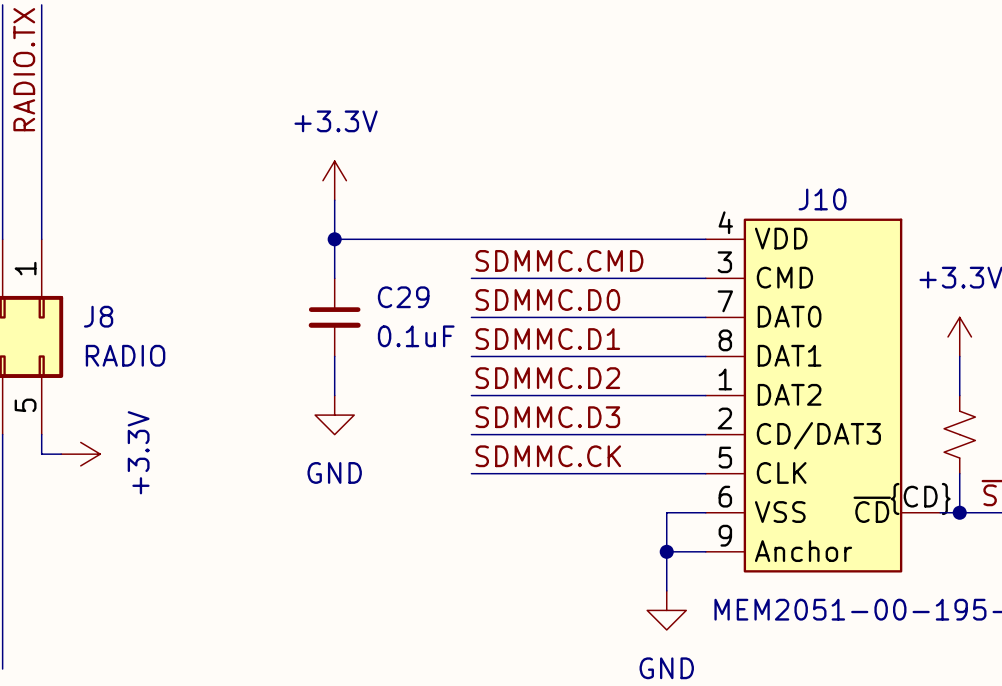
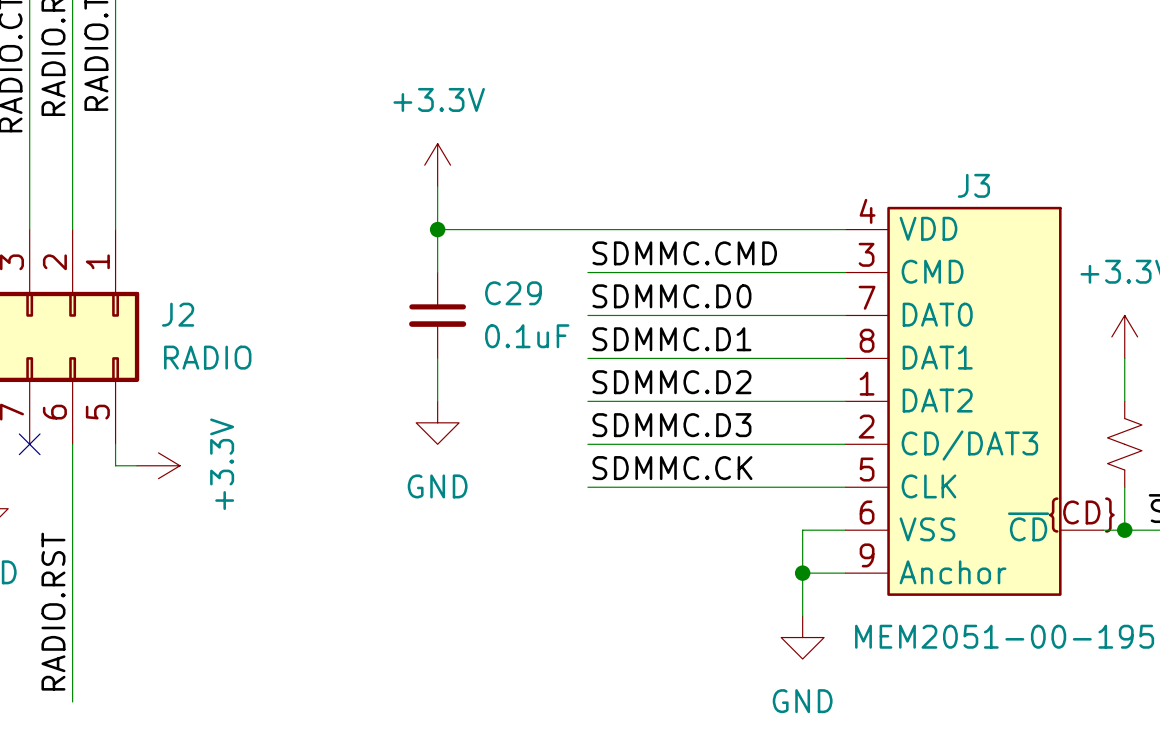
J10 name: J10 (822, 199) -> J3 (973, 185)
J8 name: J8 (98, 316) -> J2 (178, 314)

